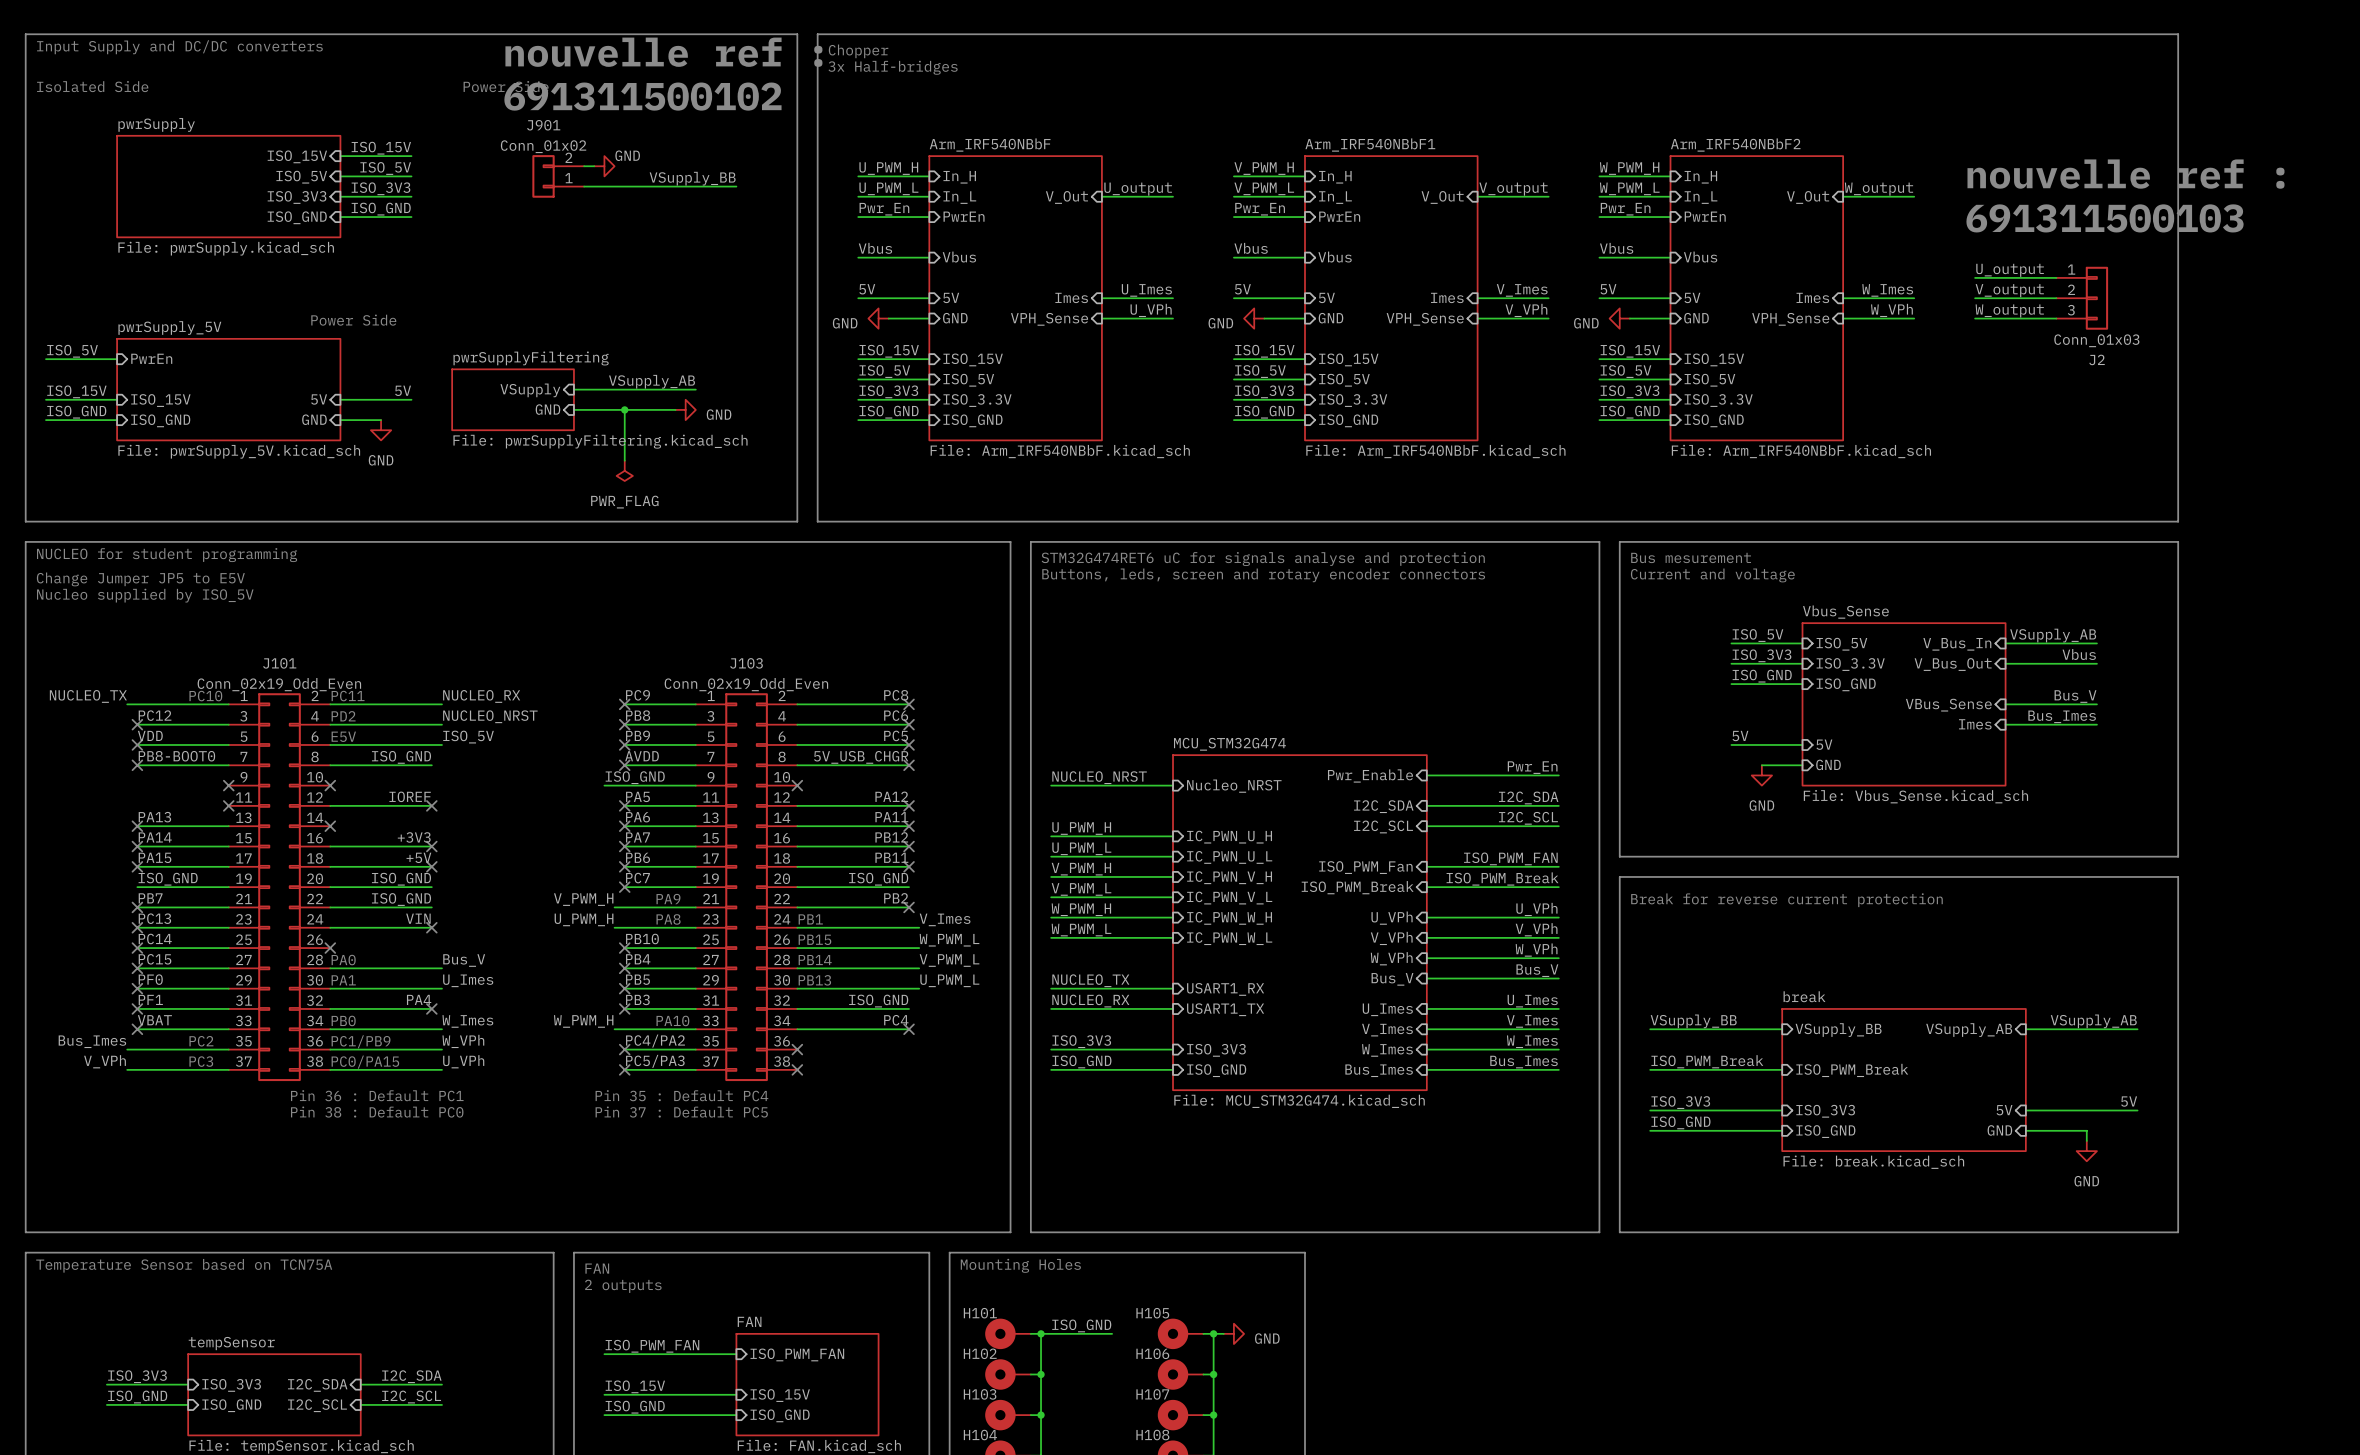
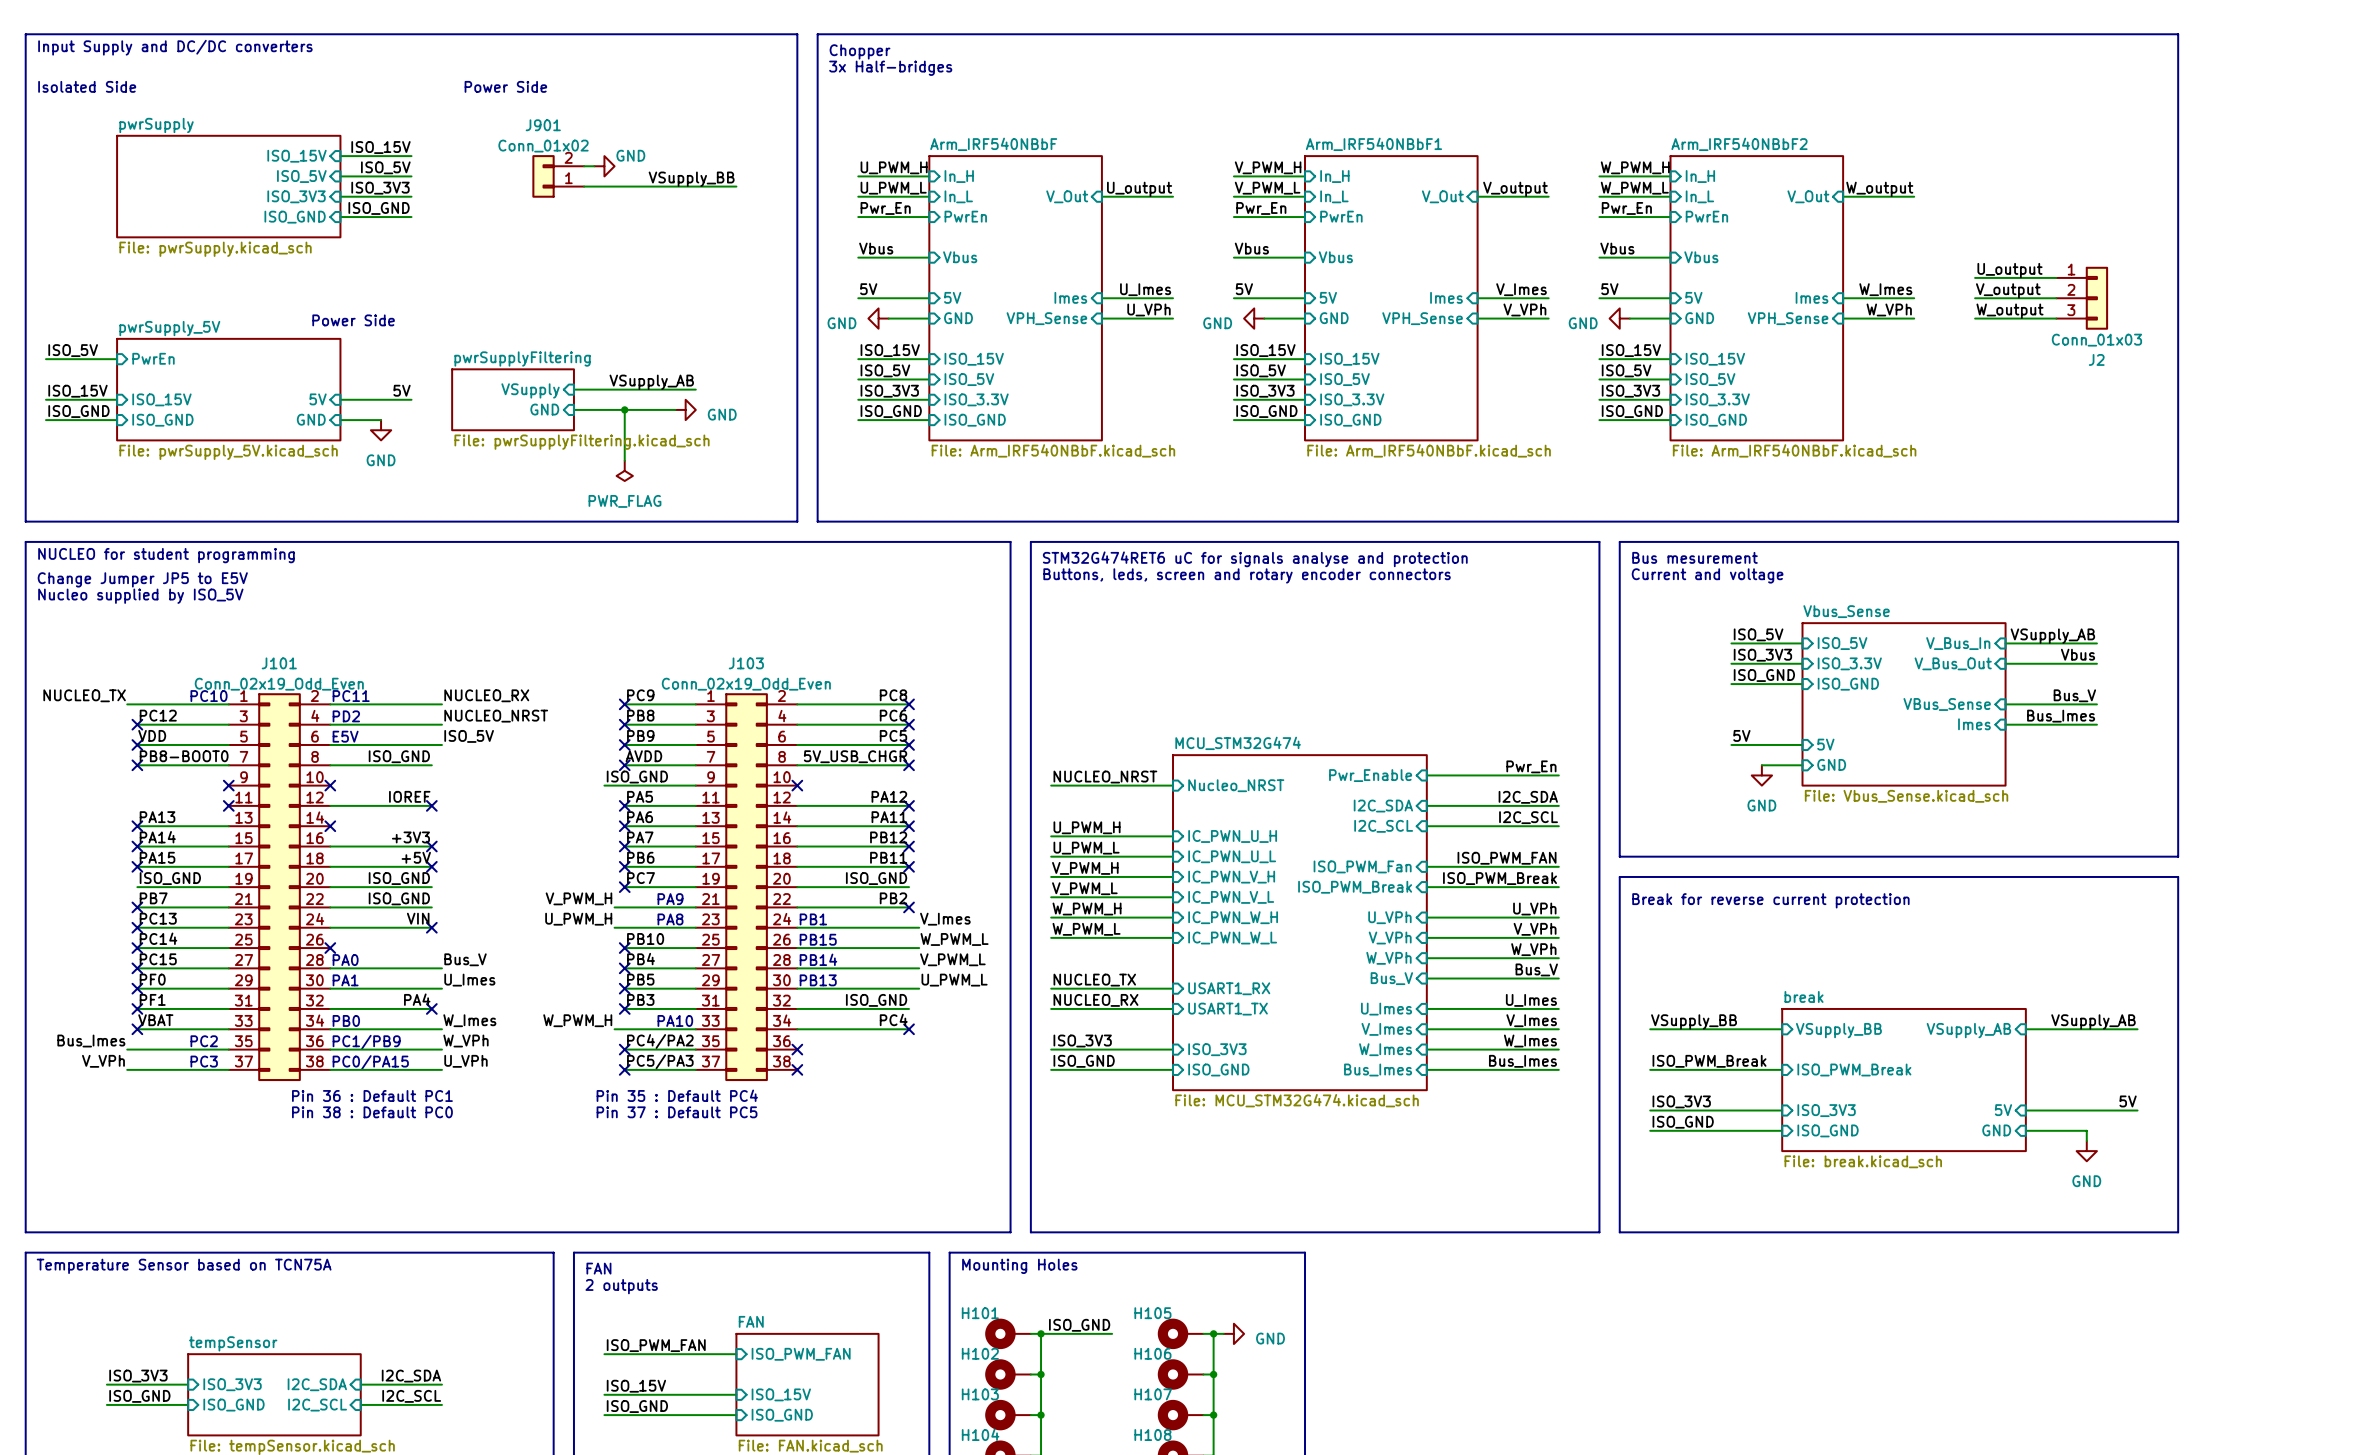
text: nouvelle ref : (663, 52) -> none
text: 691311500102 (642, 96) -> none
text: nouvelle ref : (2125, 174) -> none
text: 691311500103 (2105, 218) -> none

